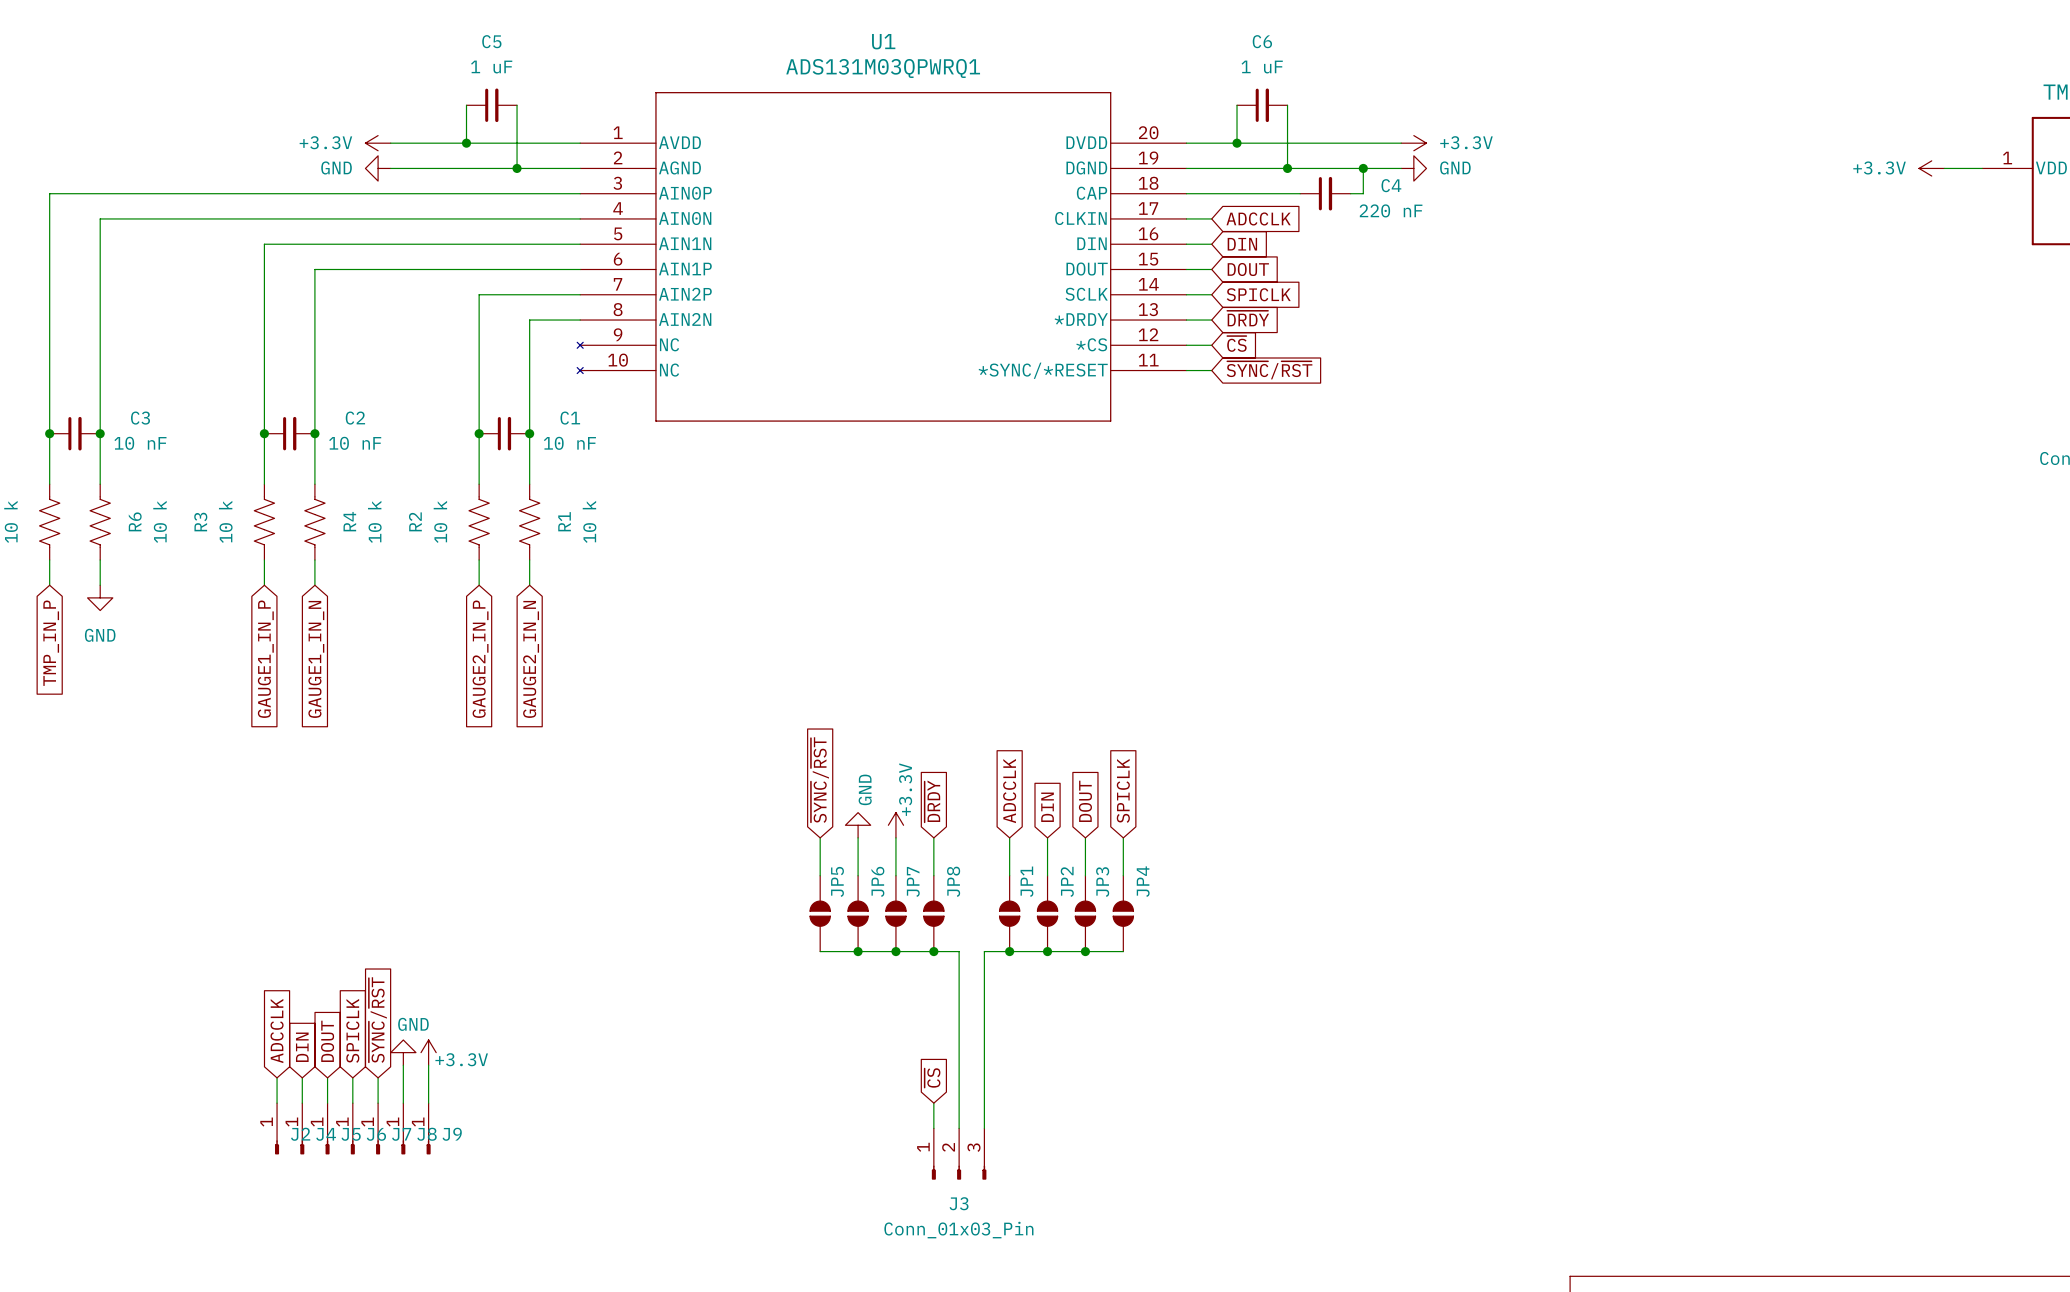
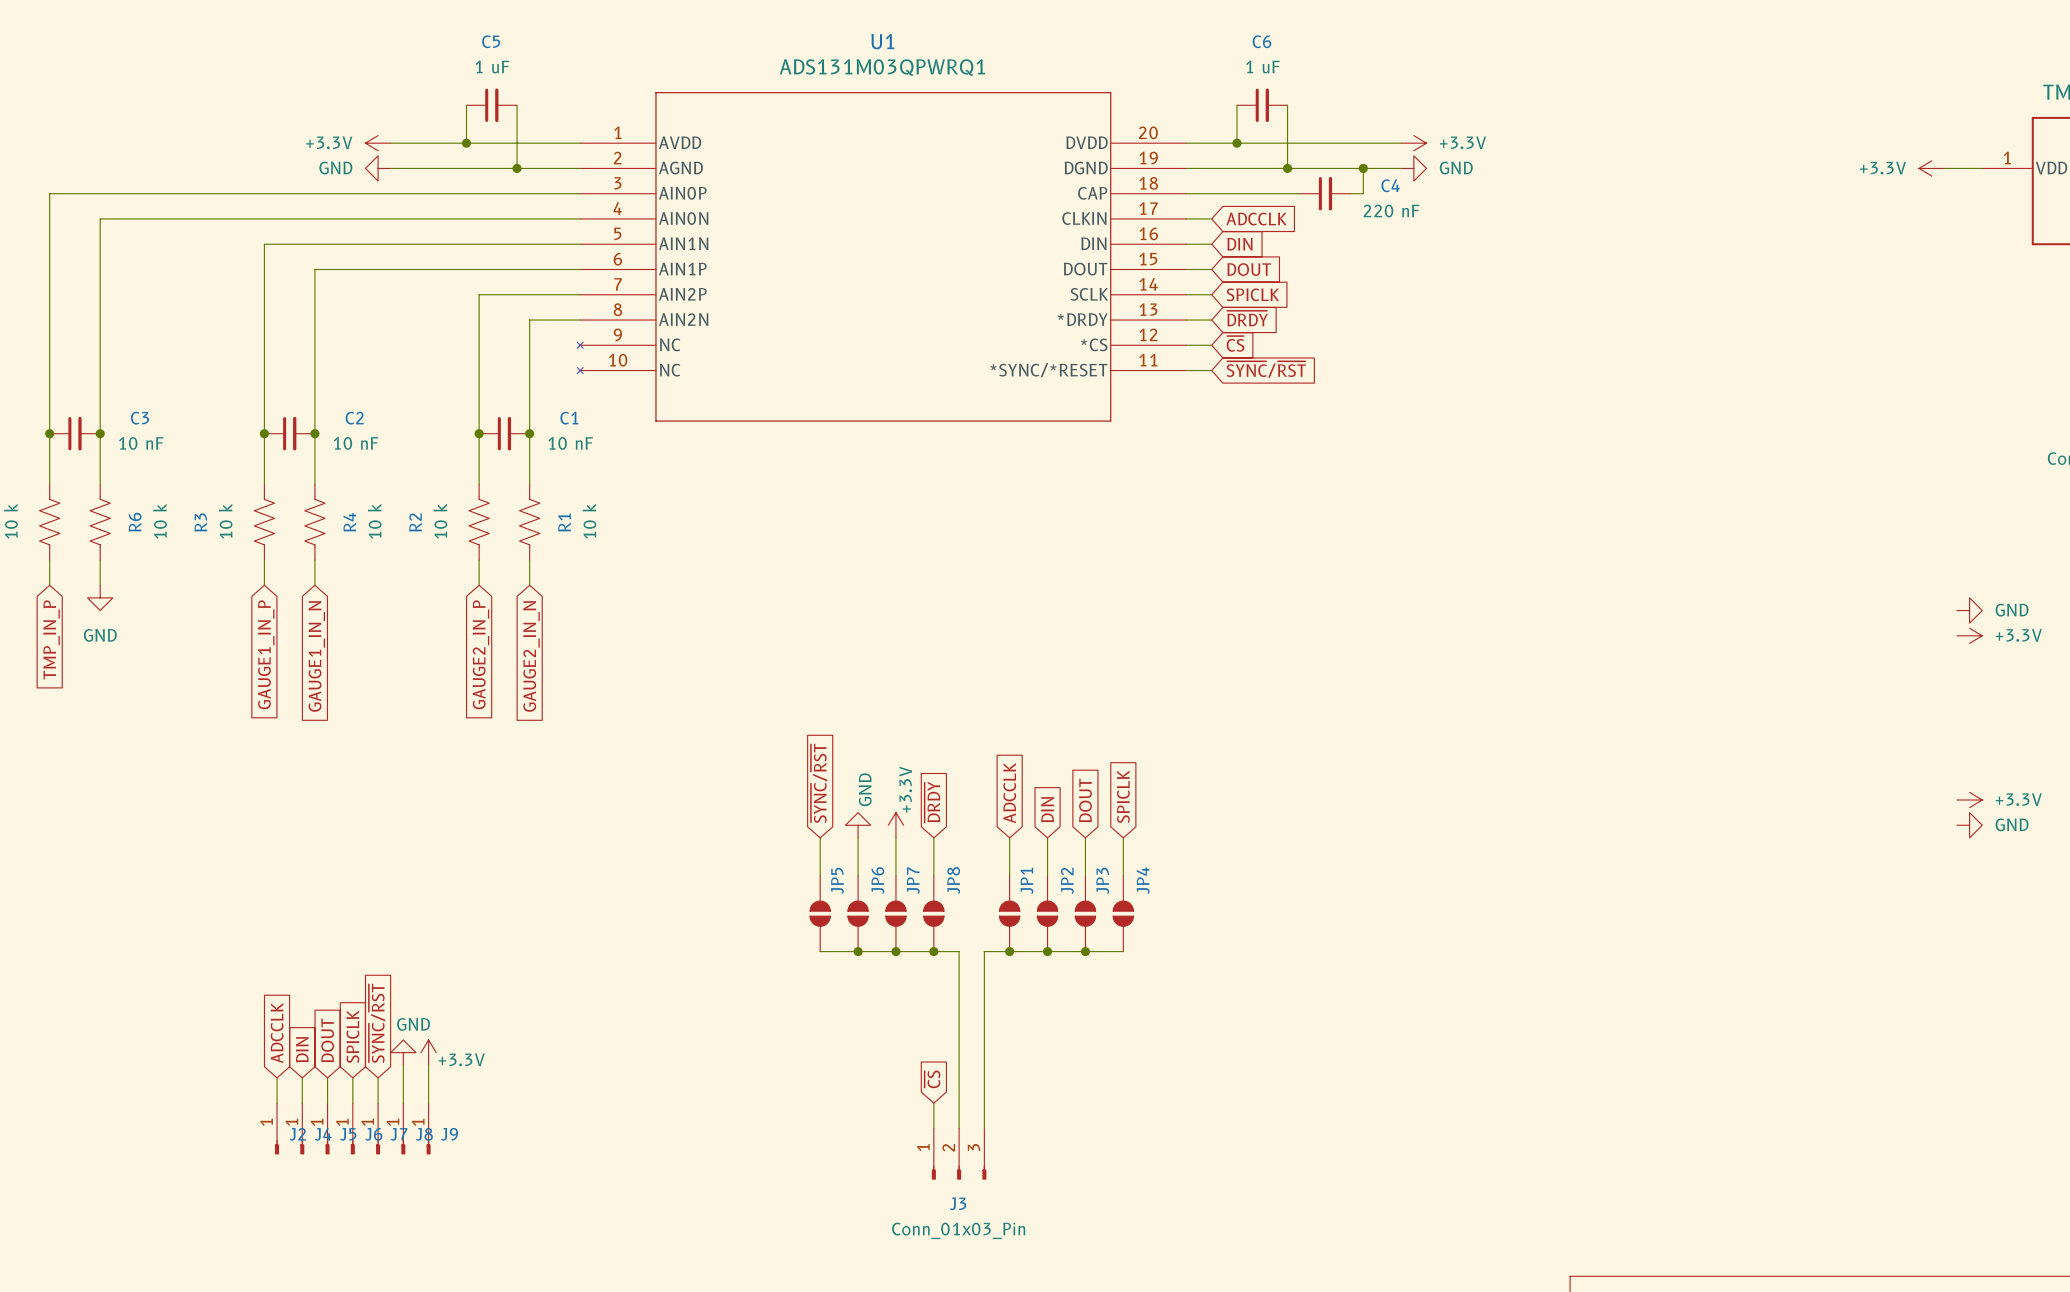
power symbol: none -> GND (1969, 610)
power symbol: none -> +3.3V (1969, 635)
power symbol: none -> +3.3V (1969, 800)
power symbol: none -> GND (1969, 825)

